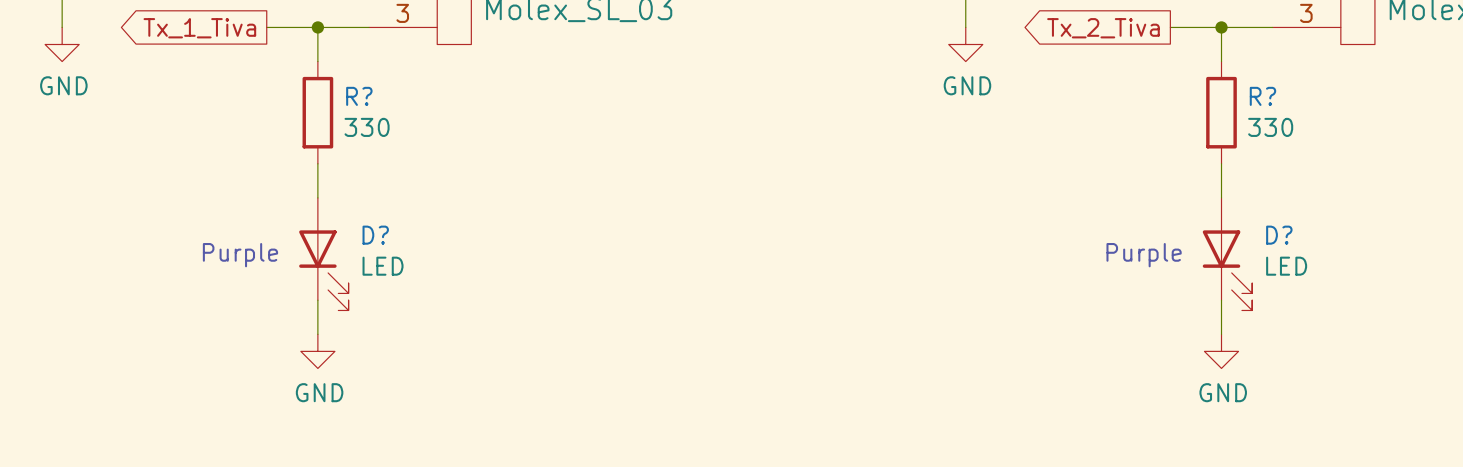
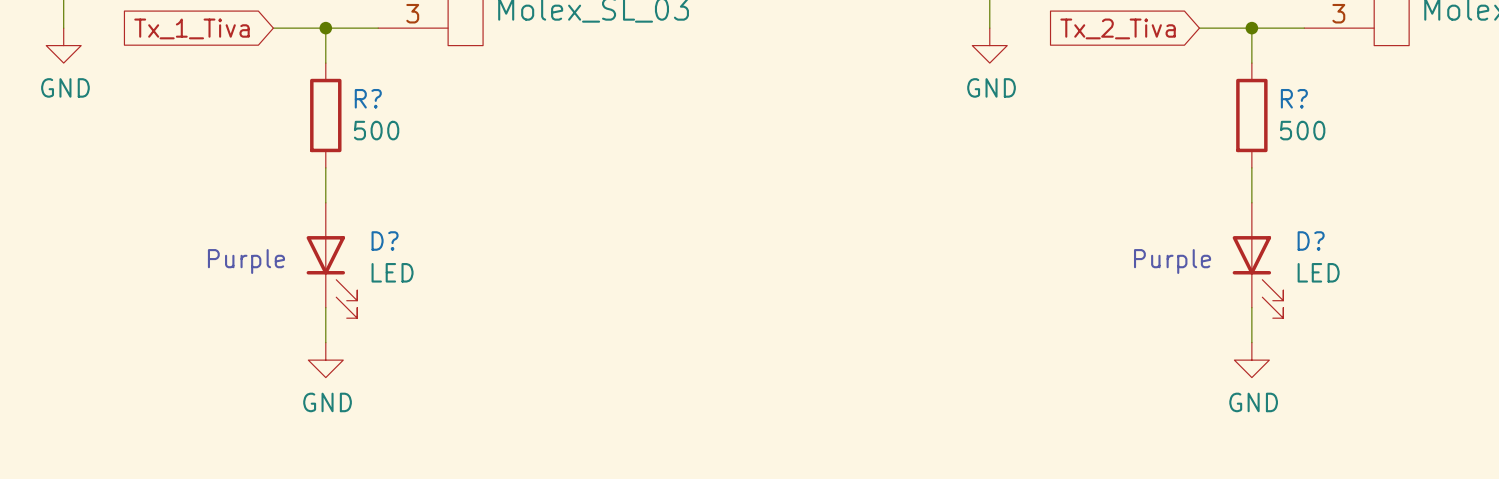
global label shape: output (199, 28) -> input (191, 28)
global label shape: output (1103, 28) -> input (1118, 28)
R? value: 330 (367, 127) -> 500 (376, 130)
R? value: 330 (1270, 127) -> 500 (1302, 130)

